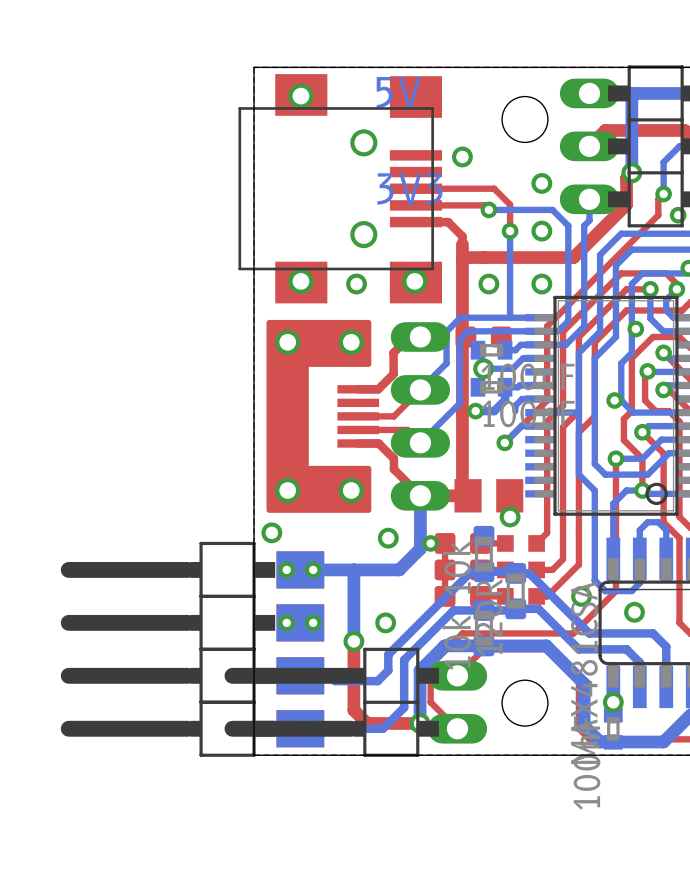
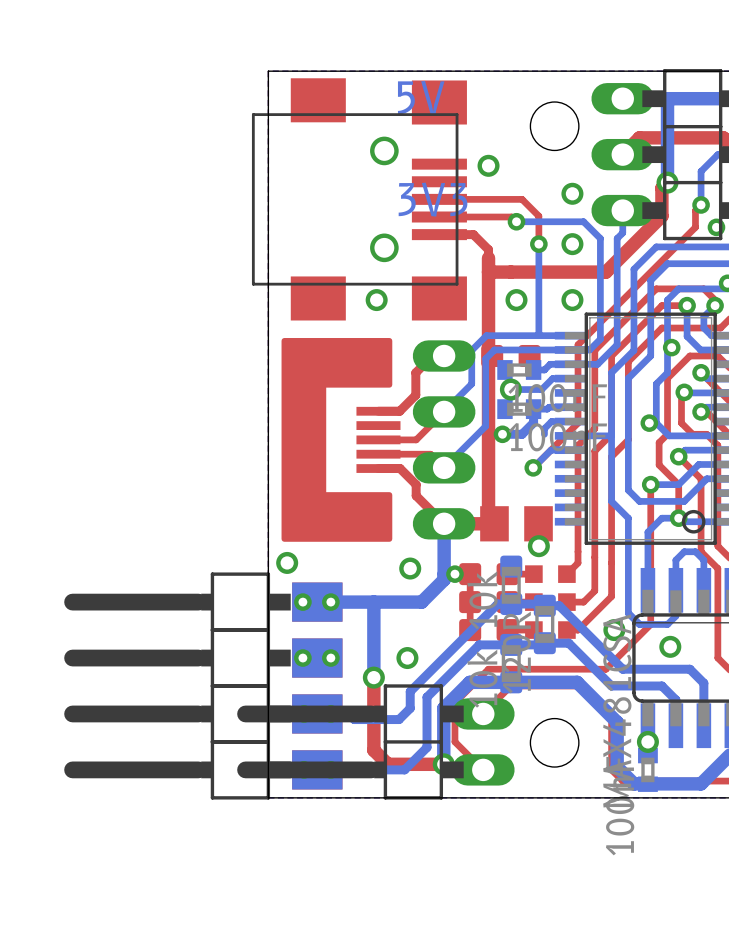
via: (300, 96) -> none
via: (300, 281) -> none
via: (414, 281) -> none
via: (287, 342) -> none
via: (351, 342) -> none
via: (287, 490) -> none
via: (351, 490) -> none

